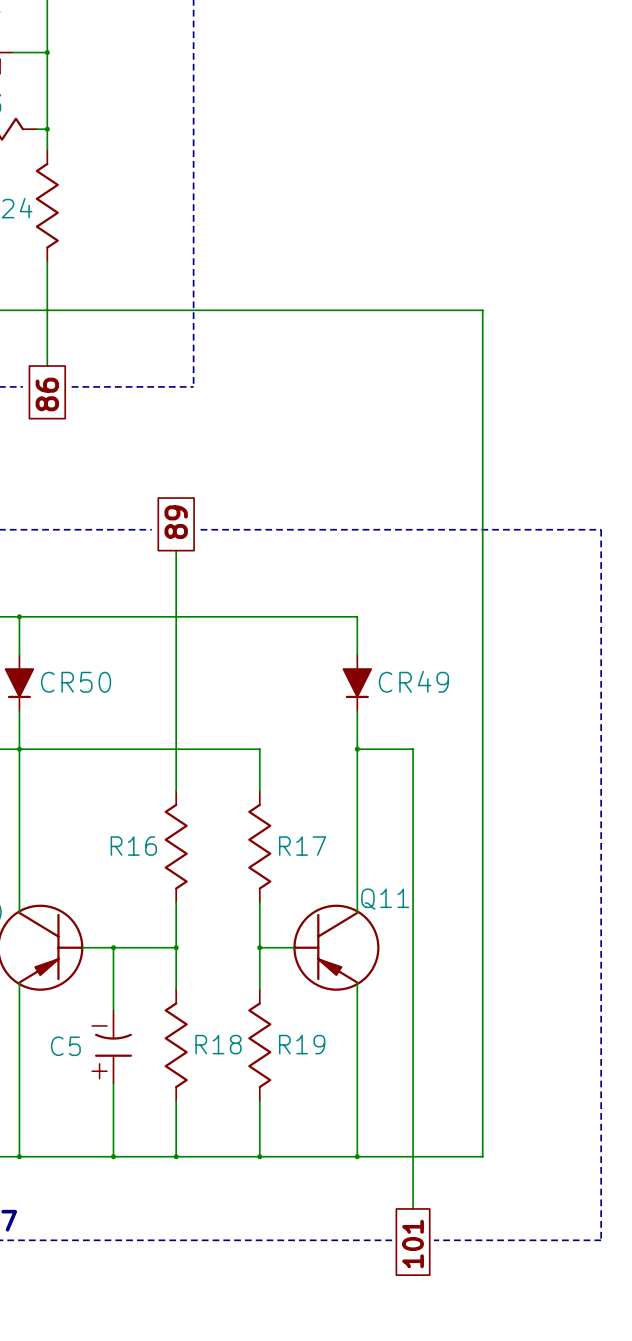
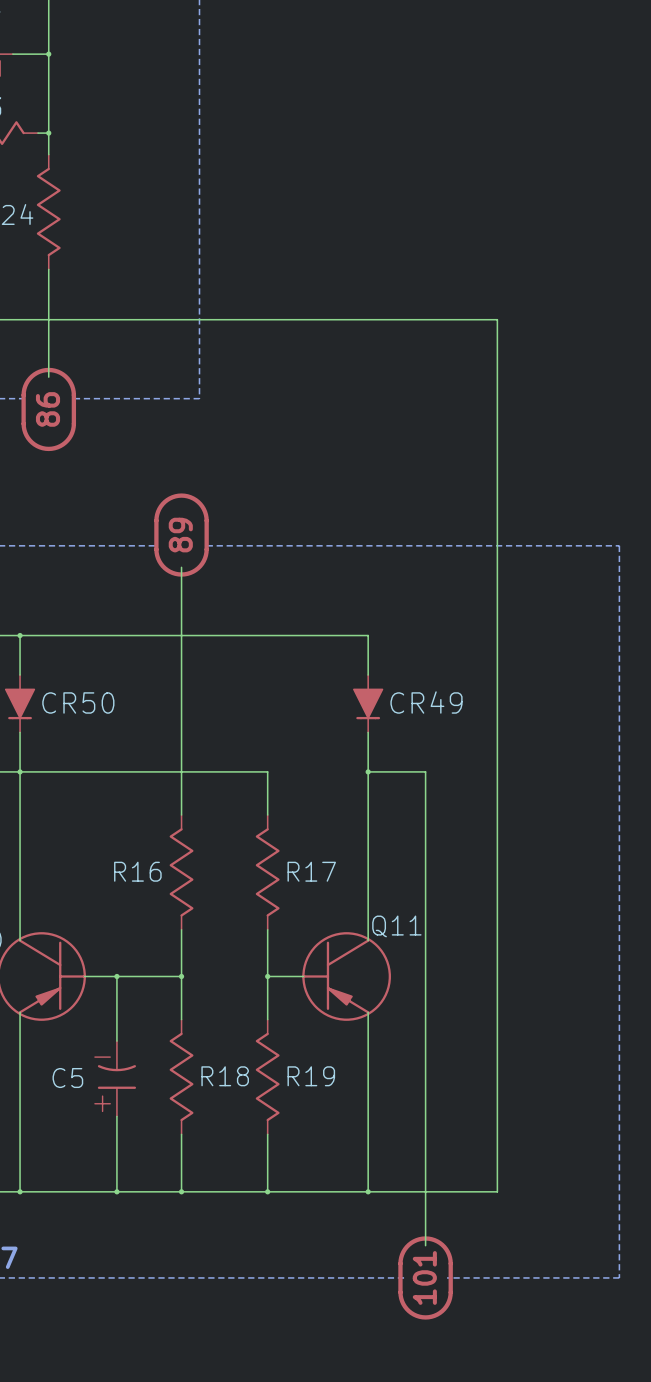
global label: 86 (47, 394) -> none
part: none -> (48, 409)
part: none -> (181, 535)
global label: 89 (176, 522) -> none
part: none -> (425, 1277)
global label: 101 (413, 1244) -> none

